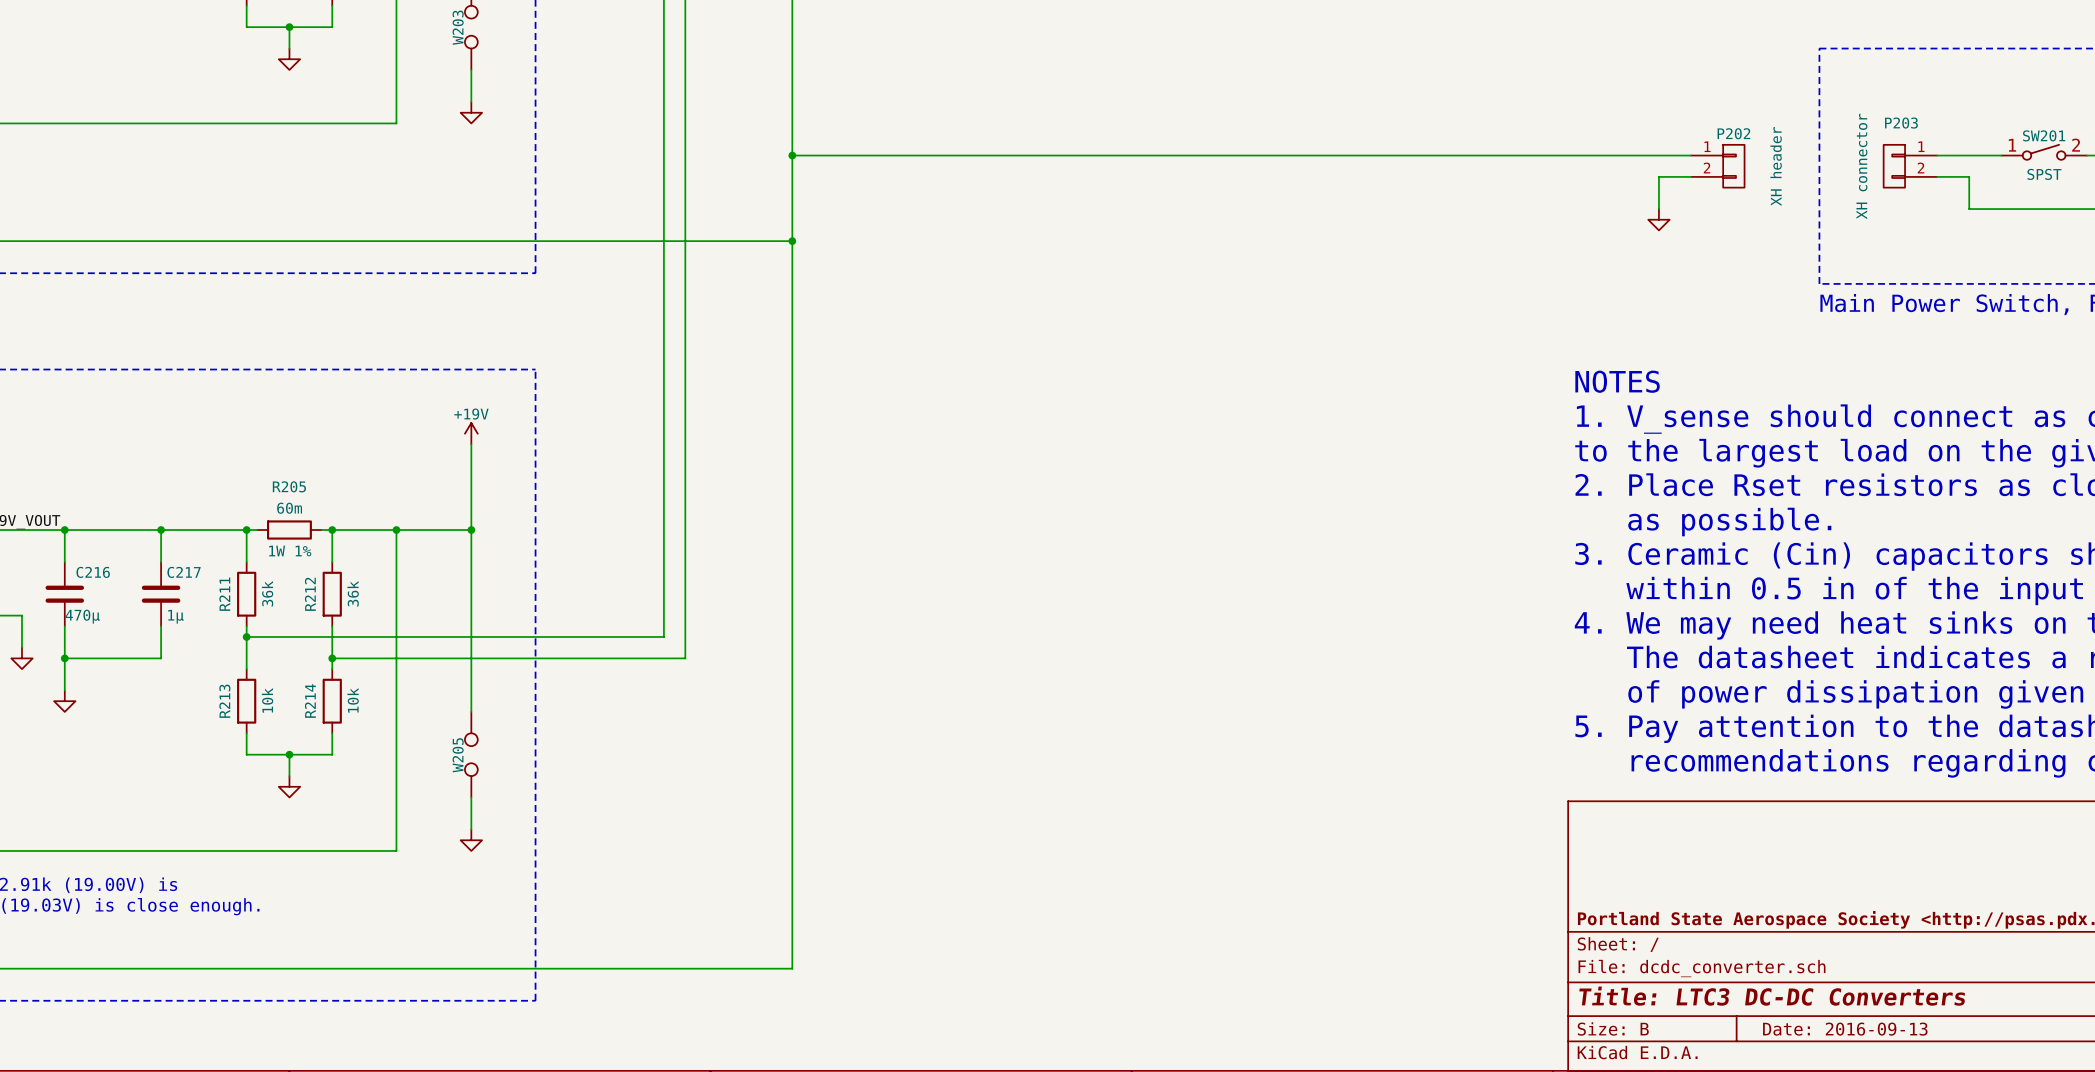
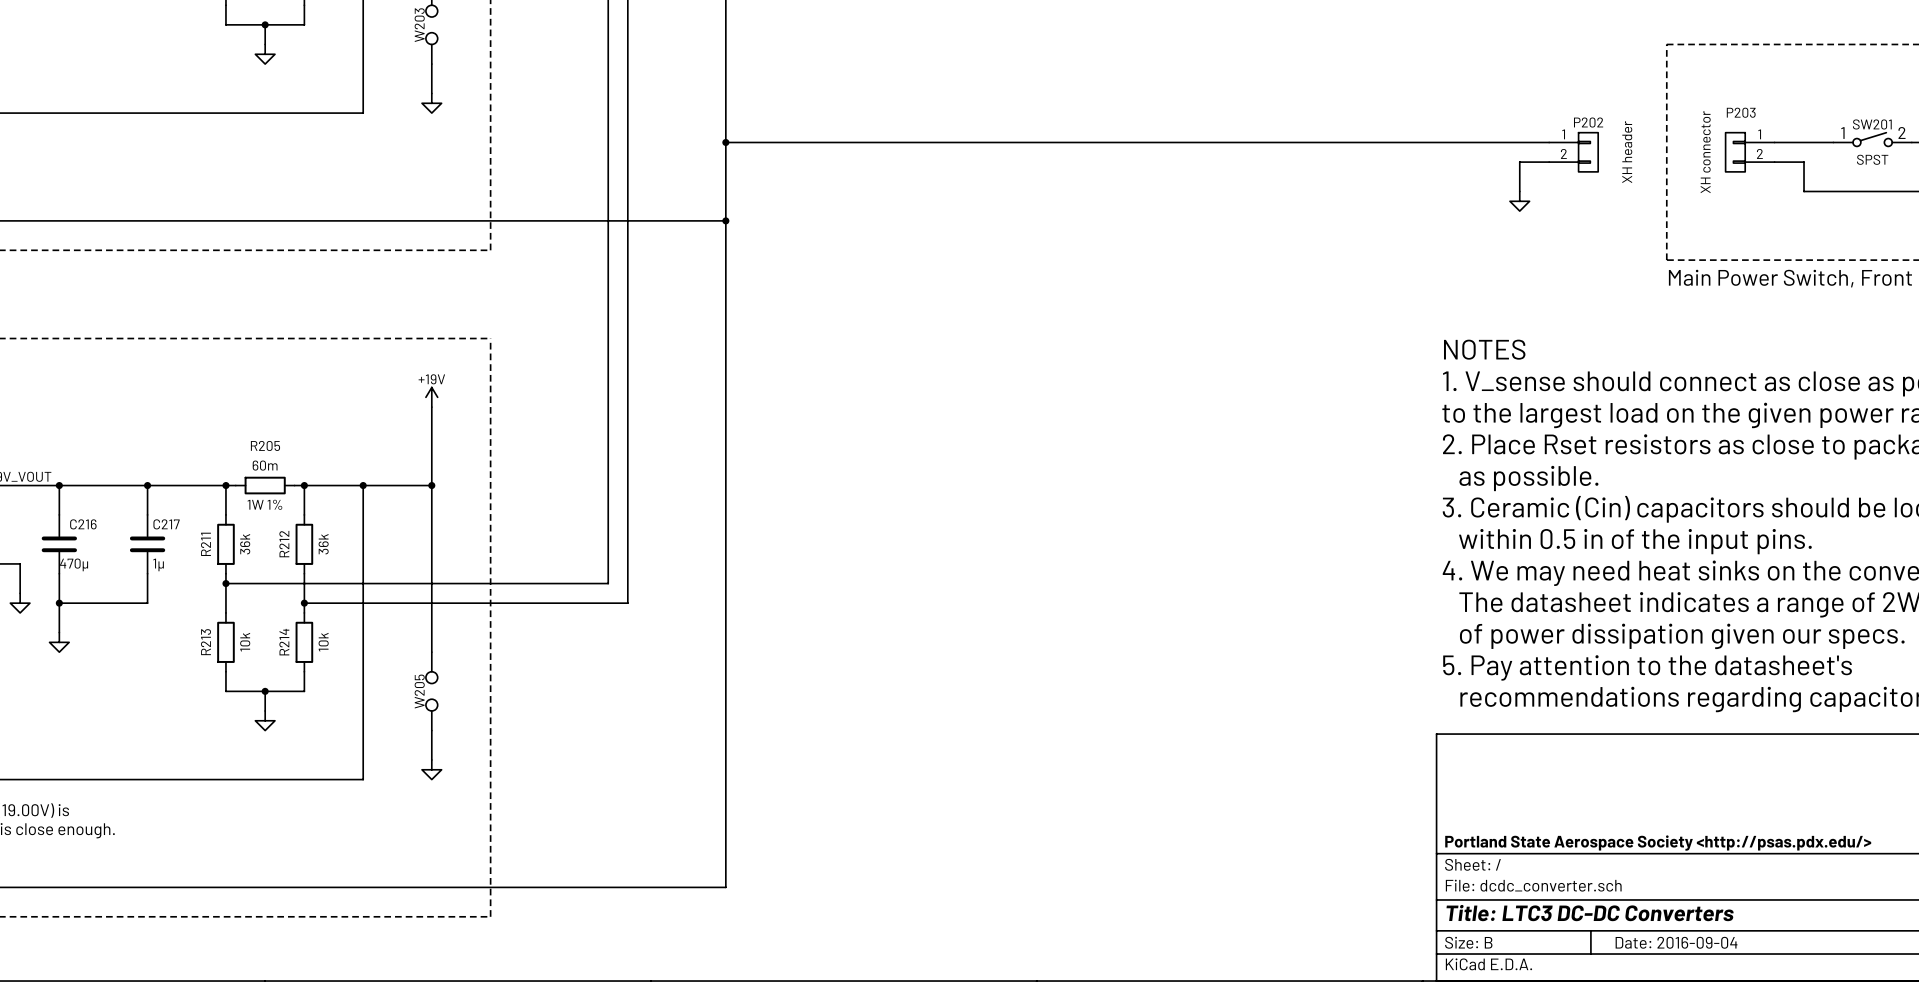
title block: Date: 2016-09-13 (1845, 1029) -> Date: 2016-09-04 (1676, 942)

